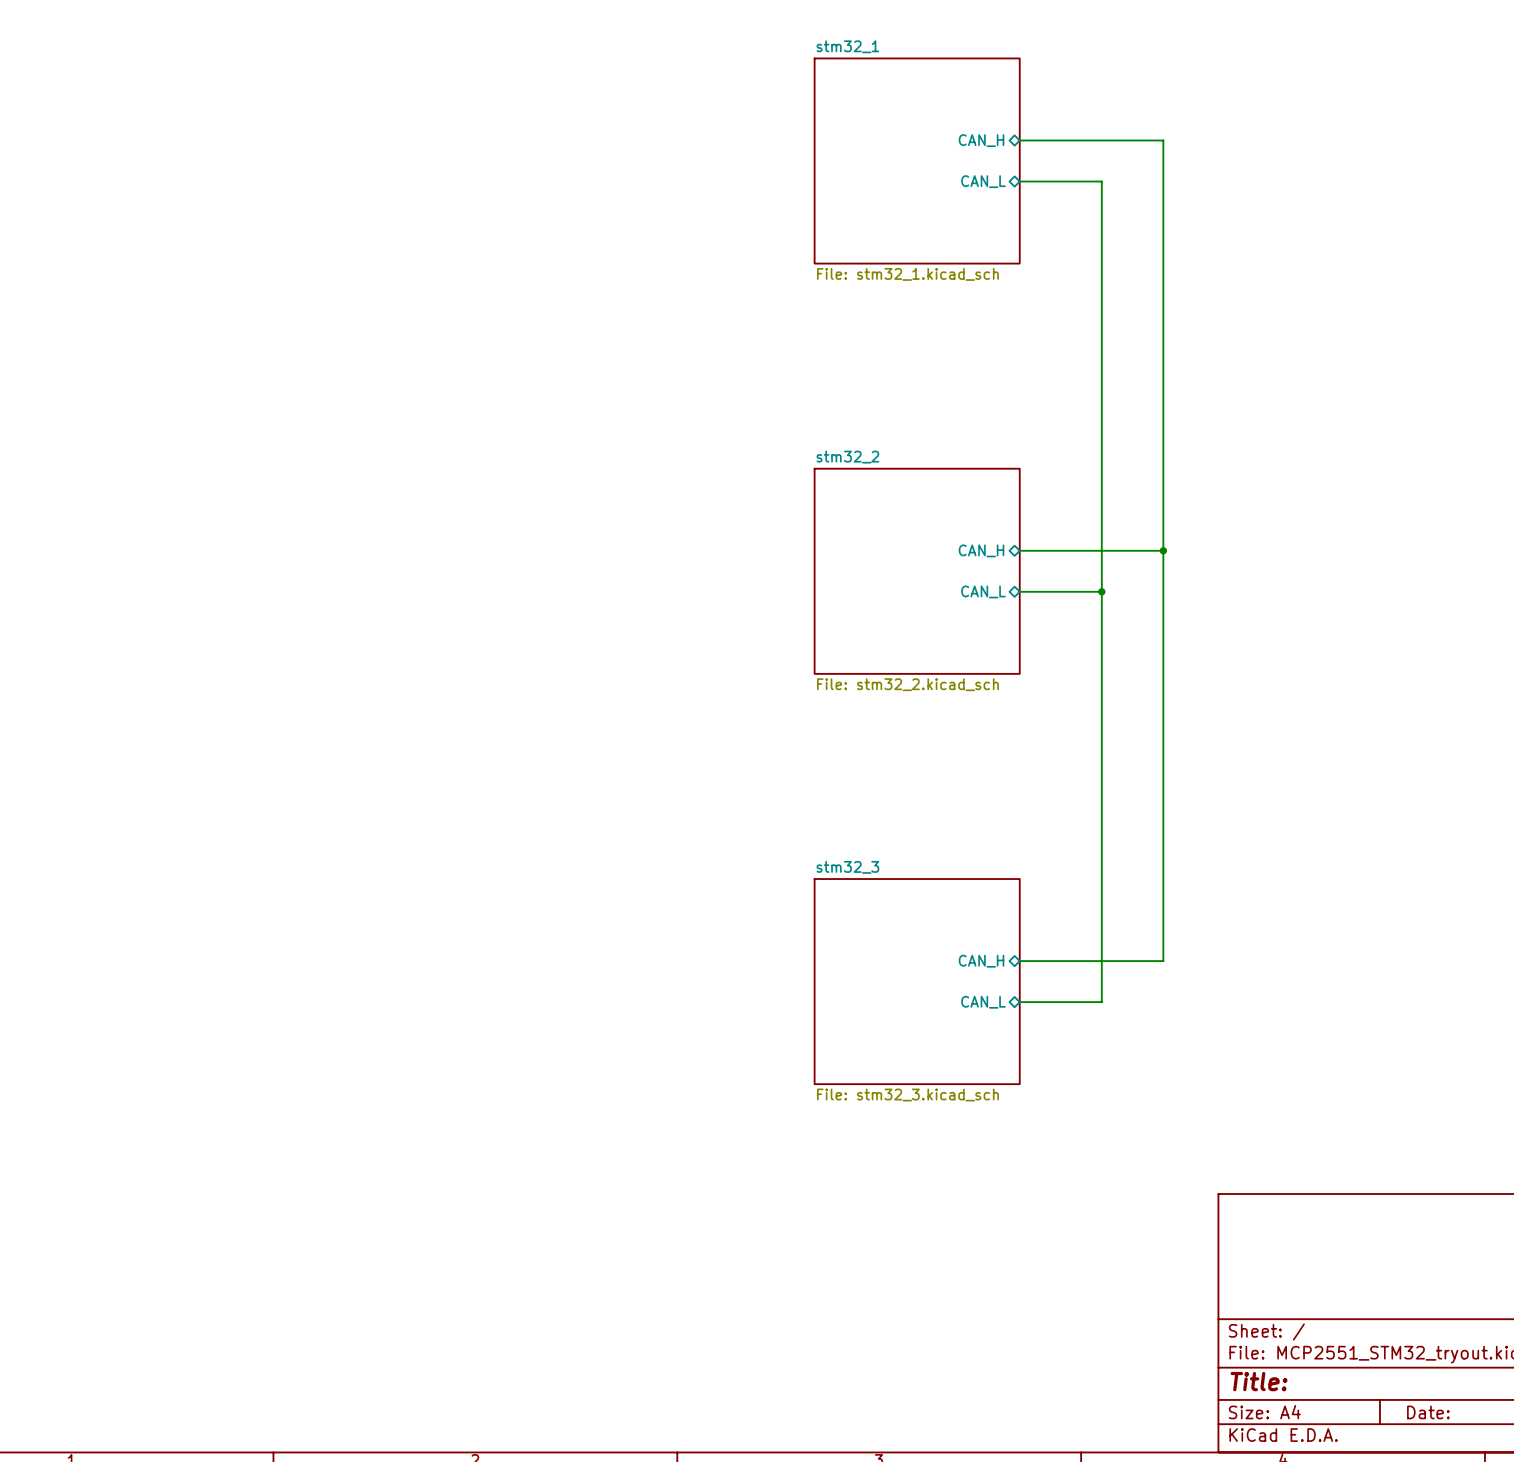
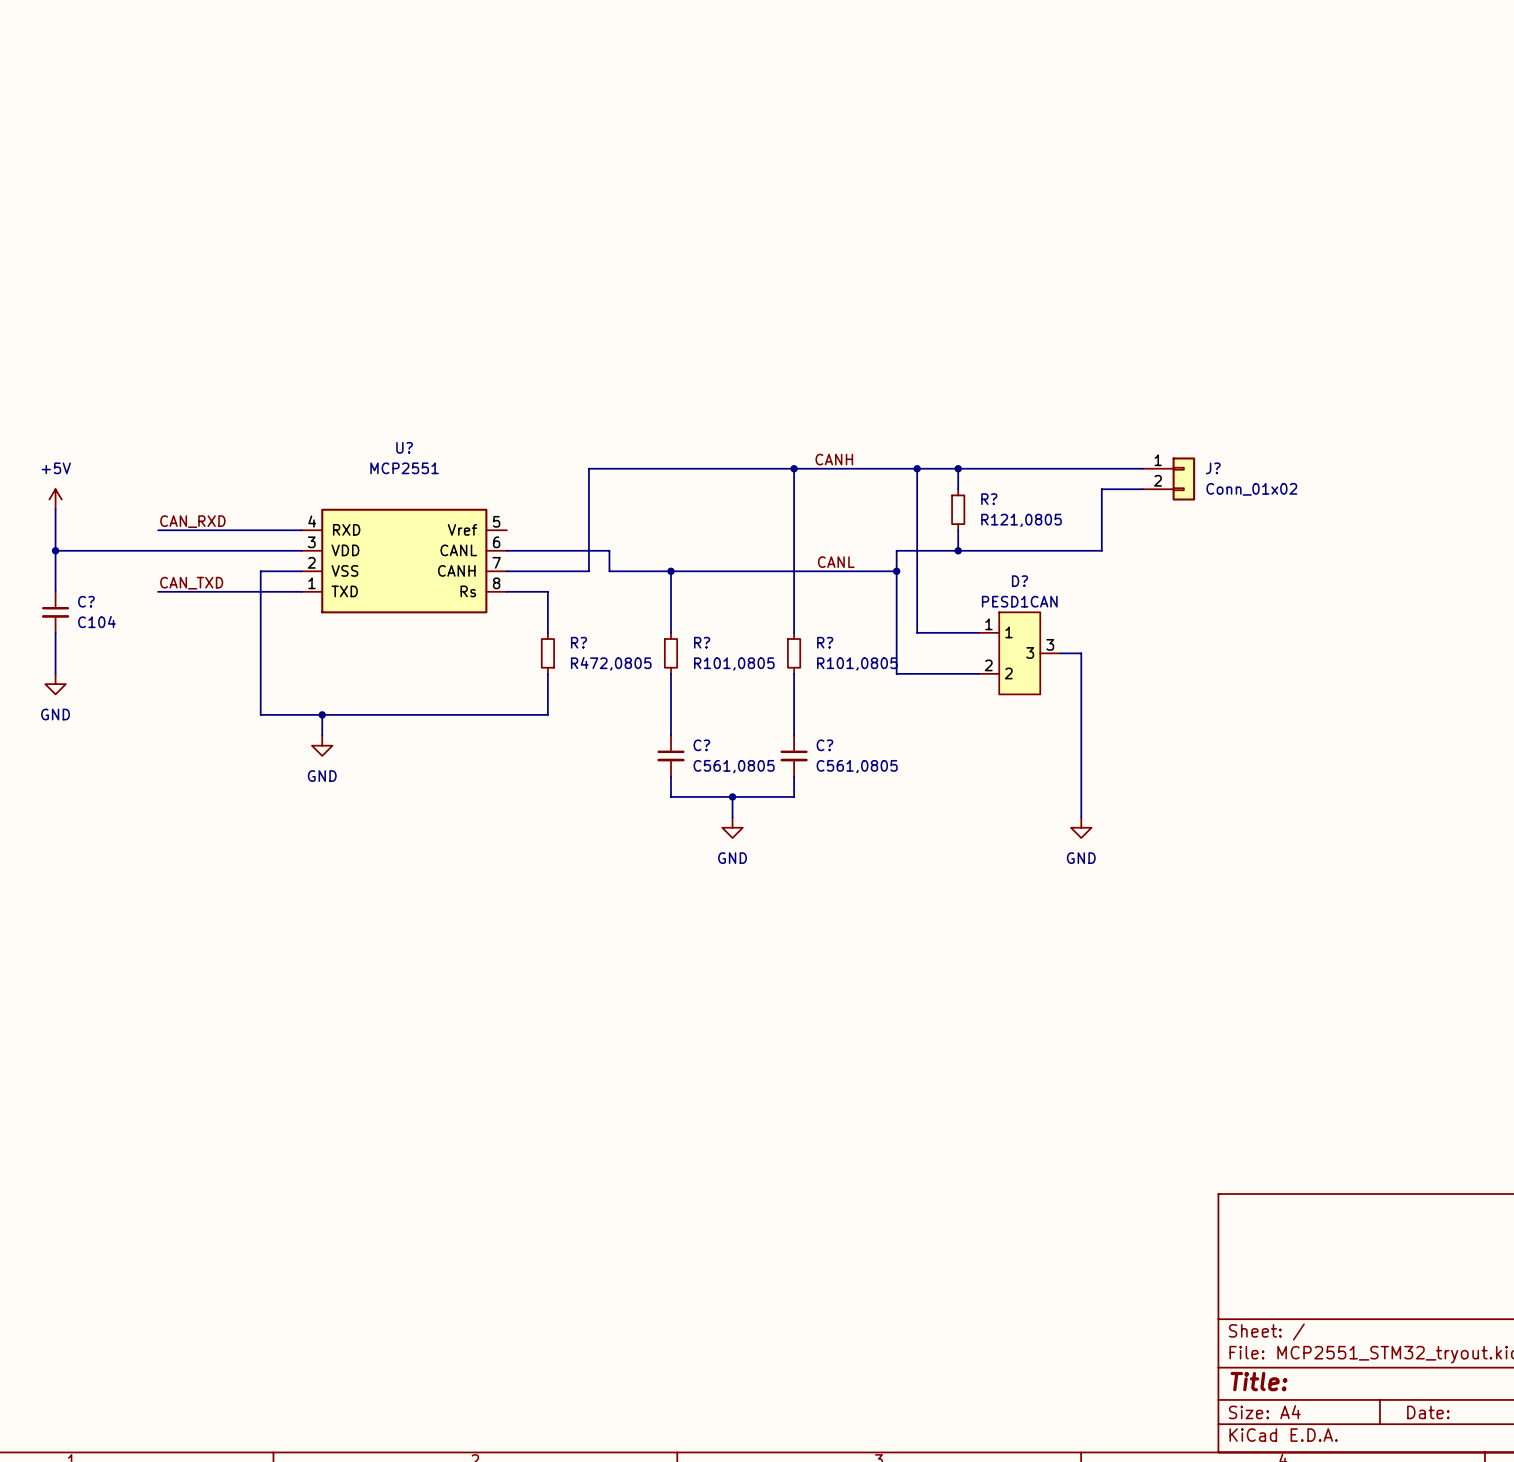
sheet pin: CAN_H (981, 140) -> none
wire: (1019, 140) (1163, 140) (1163, 961) (1019, 961) -> none
sheet stm32_1: File: stm32_1.kicad_sch (917, 161) -> none
sheet pin: CAN_L (983, 181) -> none
wire: (1019, 181) (1101, 181) (1101, 489) -> (1142, 489) (1101, 489)
label: none -> CANH (834, 459)
wire: none -> (794, 468) (794, 632)
junction: none -> (794, 468)
wire: none -> (917, 468) (917, 632) (978, 632)
junction: none -> (917, 468)
wire: none -> (958, 468) (958, 489)
junction: none -> (958, 468)
wire: none -> (1142, 468) (588, 468) (588, 571) (506, 571)
J?: none -> Conn_01x02 (1168, 478)
power symbol: none -> +5V (55, 499)
wire: none -> (55, 509) (55, 591)
R?: none -> R121,0805 (958, 509)
label: none -> CAN_RXD (192, 521)
wire: none -> (158, 530) (301, 530)
wire: none -> (958, 530) (958, 550)
wire: none -> (55, 550) (301, 550)
junction: none -> (55, 550)
wire: none -> (506, 550) (609, 550) (609, 571) (896, 571)
junction: none -> (958, 550)
sheet pin: CAN_H (981, 550) -> none
wire: none -> (1019, 550) (896, 550) (896, 673) (978, 673)
wire: (1163, 550) (1101, 550) (1101, 1002) (1019, 1002) -> none
junction: (1163, 550) -> none
U?: none -> MCP2551 (404, 561)
label: none -> CANL (836, 562)
wire: none -> (301, 571) (260, 571) (260, 714) (547, 714) (547, 673)
wire: none -> (671, 571) (671, 632)
junction: none -> (671, 571)
junction: none -> (896, 571)
sheet stm32_2: File: stm32_2.kicad_sch (917, 571) -> none
label: none -> CAN_TXD (191, 583)
wire: none -> (158, 591) (301, 591)
wire: none -> (506, 591) (547, 591) (547, 632)
sheet pin: CAN_L (983, 591) -> none
wire: (1019, 591) (1101, 591) -> none
junction: (1101, 591) -> none
C?: none -> C104 (55, 612)
wire: none -> (55, 632) (55, 673)
R?: none -> R472,0805 (547, 653)
R?: none -> R101,0805 (671, 653)
R?: none -> R101,0805 (794, 653)
D?: none -> PESD1CAN (1019, 653)
wire: none -> (1060, 653) (1081, 653) (1081, 817)
wire: none -> (671, 673) (671, 735)
wire: none -> (794, 673) (794, 735)
power symbol: none -> GND (55, 684)
wire: none -> (322, 714) (322, 735)
junction: none -> (322, 714)
power symbol: none -> GND (322, 745)
C?: none -> C561,0805 (671, 755)
C?: none -> C561,0805 (794, 755)
wire: none -> (671, 776) (671, 796) (794, 796) (794, 776)
wire: none -> (732, 796) (732, 817)
junction: none -> (732, 796)
power symbol: none -> GND (732, 827)
power symbol: none -> GND (1081, 827)
sheet pin: CAN_H (981, 961) -> none
sheet stm32_3: File: stm32_3.kicad_sch (917, 981) -> none
sheet pin: CAN_L (983, 1002) -> none

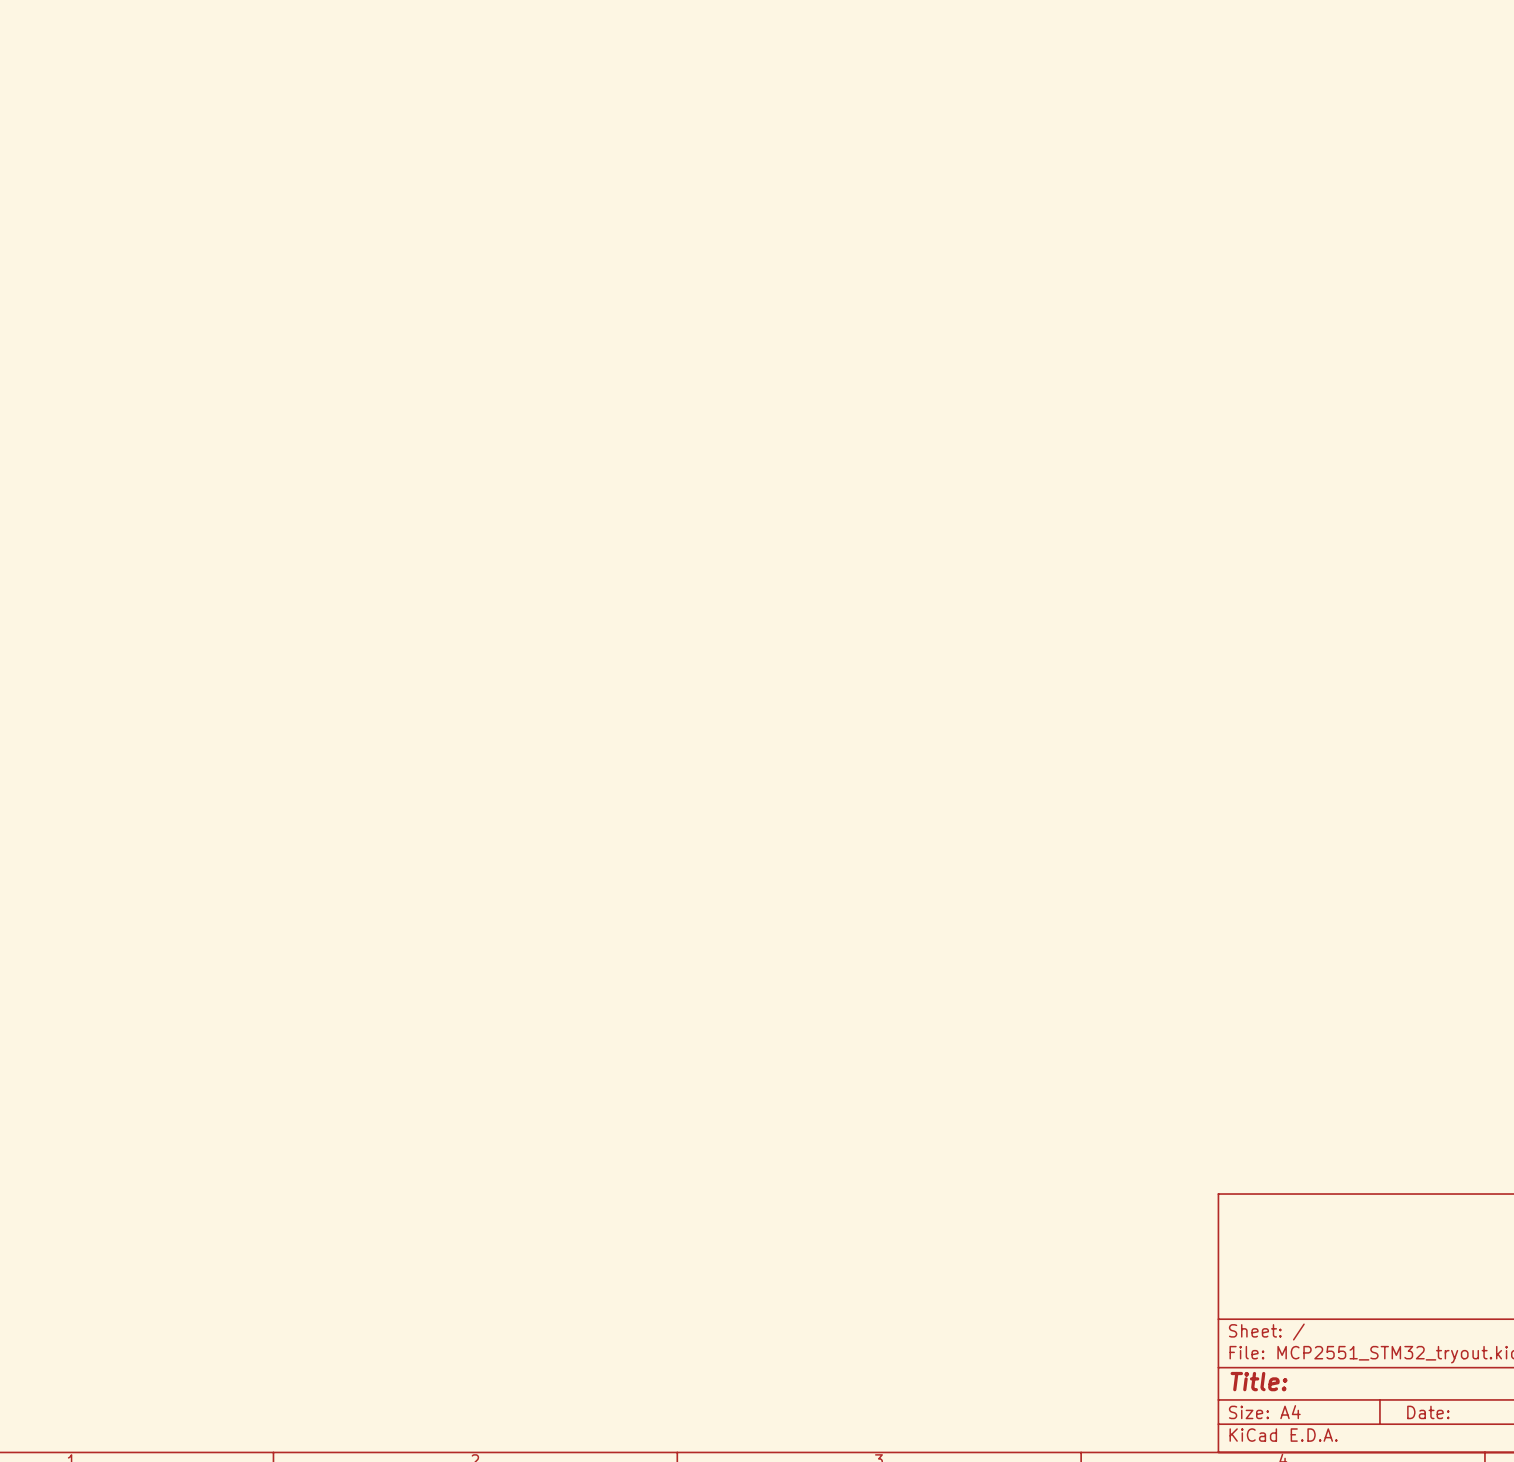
label: CANH (834, 459) -> none
wire: (794, 468) (794, 632) -> none
junction: (794, 468) -> none
wire: (917, 468) (917, 632) (978, 632) -> none
junction: (917, 468) -> none
wire: (958, 468) (958, 489) -> none
junction: (958, 468) -> none
wire: (1142, 468) (588, 468) (588, 571) (506, 571) -> none
J?: Conn_01x02 (1168, 478) -> none
wire: (1142, 489) (1101, 489) (1101, 550) (896, 550) (896, 673) (978, 673) -> none
power symbol: +5V (55, 499) -> none
wire: (55, 509) (55, 591) -> none
R?: R121,0805 (958, 509) -> none
label: CAN_RXD (192, 521) -> none
wire: (158, 530) (301, 530) -> none
wire: (958, 530) (958, 550) -> none
wire: (55, 550) (301, 550) -> none
junction: (55, 550) -> none
wire: (506, 550) (609, 550) (609, 571) (896, 571) -> none
junction: (958, 550) -> none
U?: MCP2551 (404, 561) -> none
label: CANL (836, 562) -> none
wire: (301, 571) (260, 571) (260, 714) (547, 714) (547, 673) -> none
wire: (671, 571) (671, 632) -> none
junction: (671, 571) -> none
junction: (896, 571) -> none
label: CAN_TXD (191, 583) -> none
wire: (158, 591) (301, 591) -> none
wire: (506, 591) (547, 591) (547, 632) -> none
C?: C104 (55, 612) -> none
wire: (55, 632) (55, 673) -> none
R?: R472,0805 (547, 653) -> none
R?: R101,0805 (671, 653) -> none
R?: R101,0805 (794, 653) -> none
D?: PESD1CAN (1019, 653) -> none
wire: (1060, 653) (1081, 653) (1081, 817) -> none
wire: (671, 673) (671, 735) -> none
wire: (794, 673) (794, 735) -> none
power symbol: GND (55, 684) -> none
wire: (322, 714) (322, 735) -> none
junction: (322, 714) -> none
power symbol: GND (322, 745) -> none
C?: C561,0805 (671, 755) -> none
C?: C561,0805 (794, 755) -> none
wire: (671, 776) (671, 796) (794, 796) (794, 776) -> none
wire: (732, 796) (732, 817) -> none
junction: (732, 796) -> none
power symbol: GND (732, 827) -> none
power symbol: GND (1081, 827) -> none

